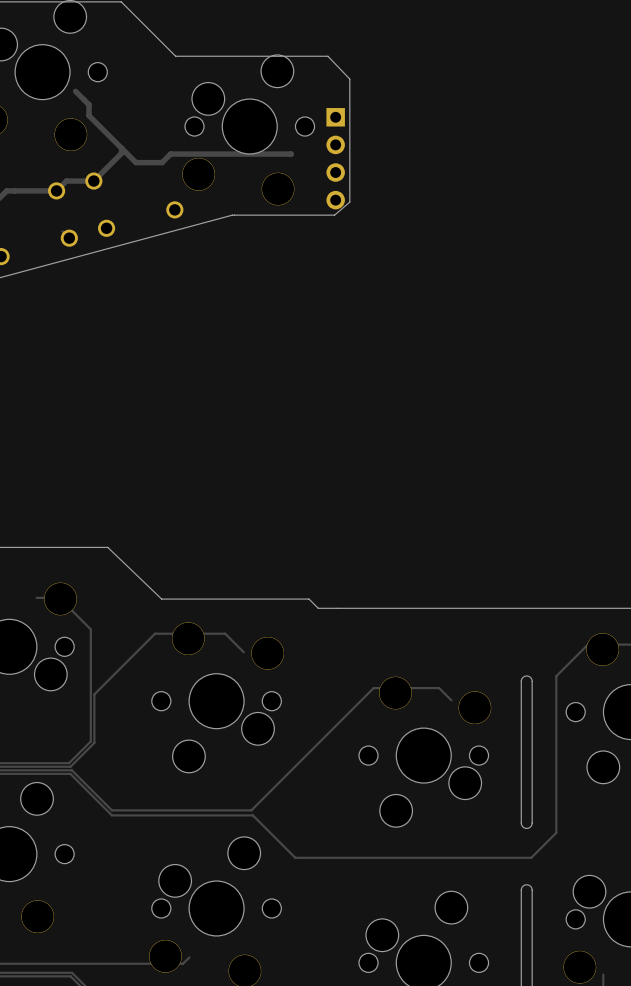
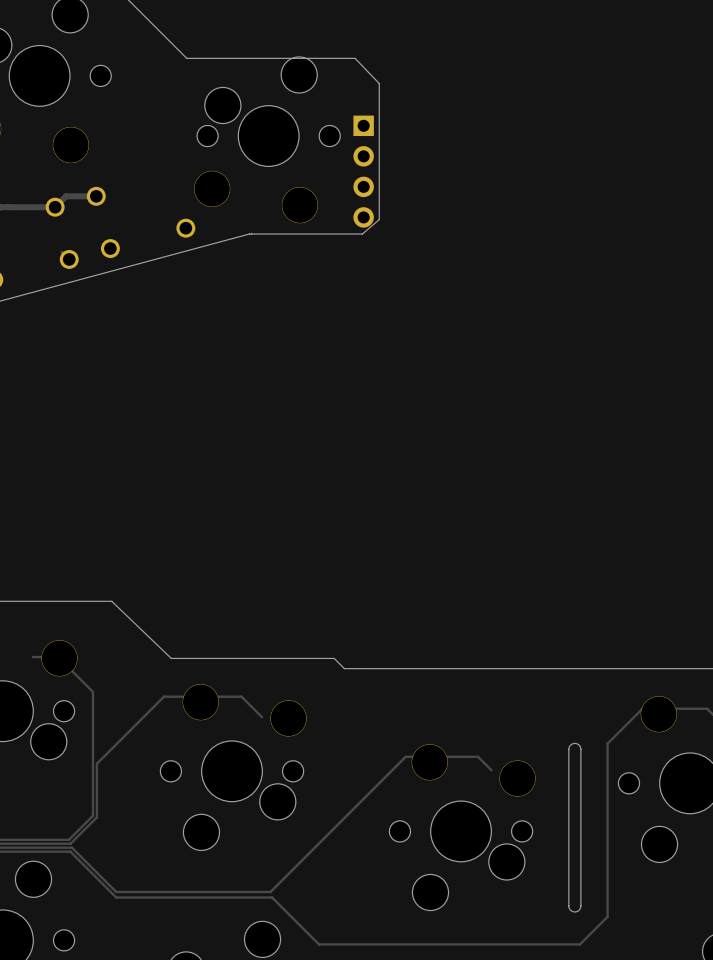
track: (75, 91) (89, 104) (89, 115) (136, 162) (162, 162) (170, 154) (291, 154) -> none
track: (121, 148) (121, 153) (93, 181) -> none

